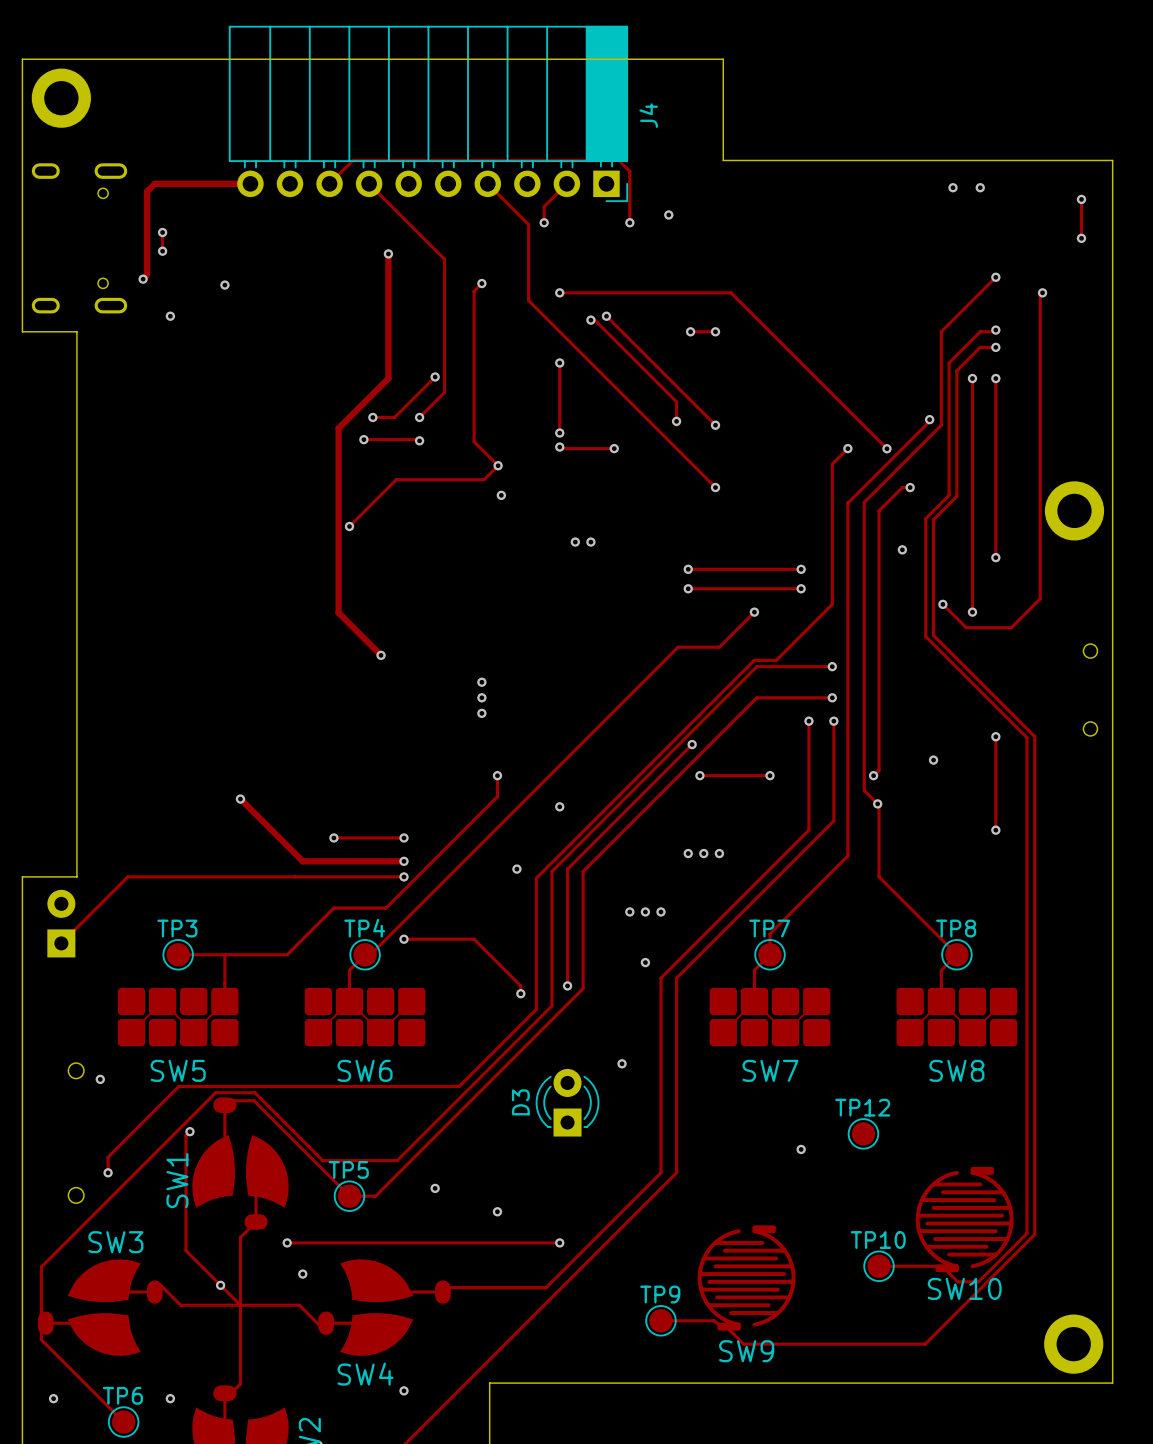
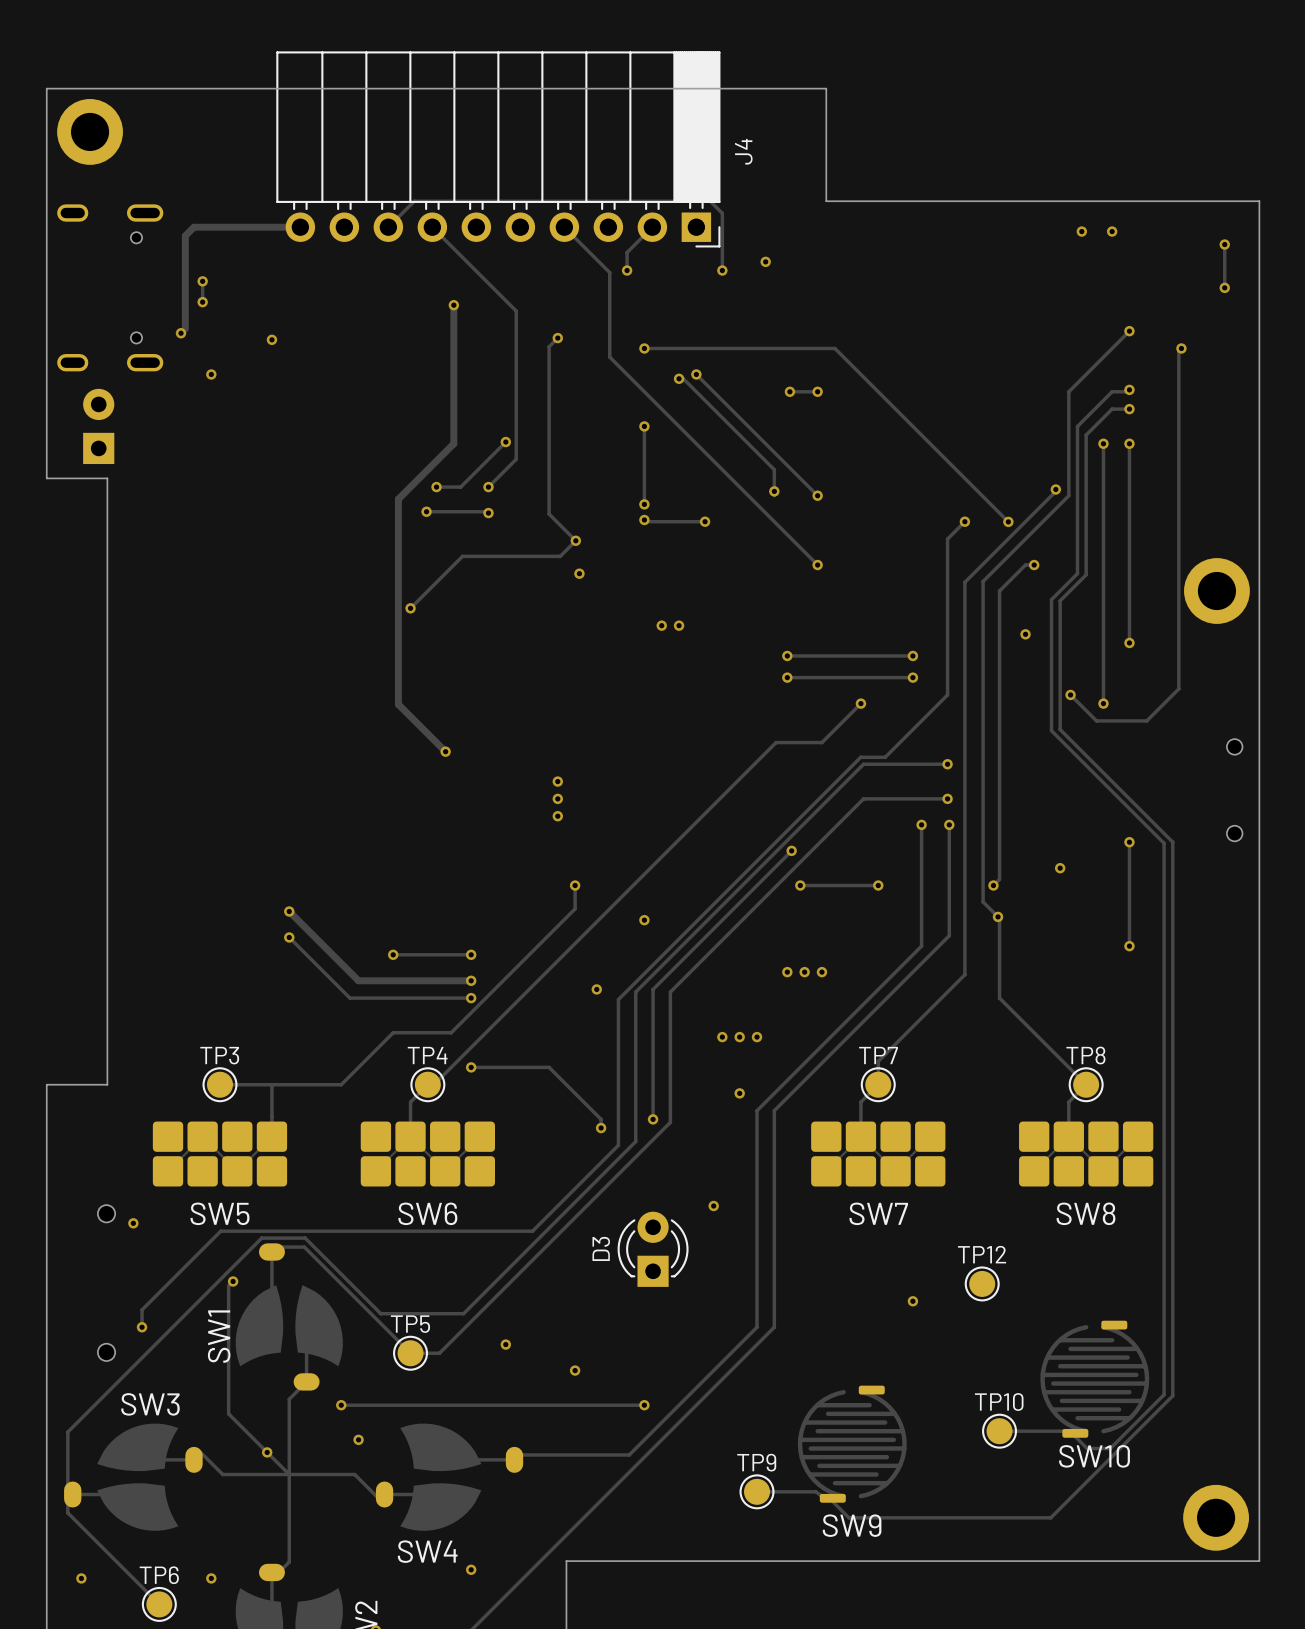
board edge: (22, 331) (76, 331) (76, 409) -> (46, 391) (46, 478) (107, 478)
part: none -> (98, 426)
via: none -> (289, 937)
board edge: (76, 876) (22, 876) (22, 954) -> (107, 998) (107, 1084) (46, 1084)
track: (294, 876) (127, 876) (61, 943) -> (349, 998) (289, 937)
part: (61, 923) -> none

